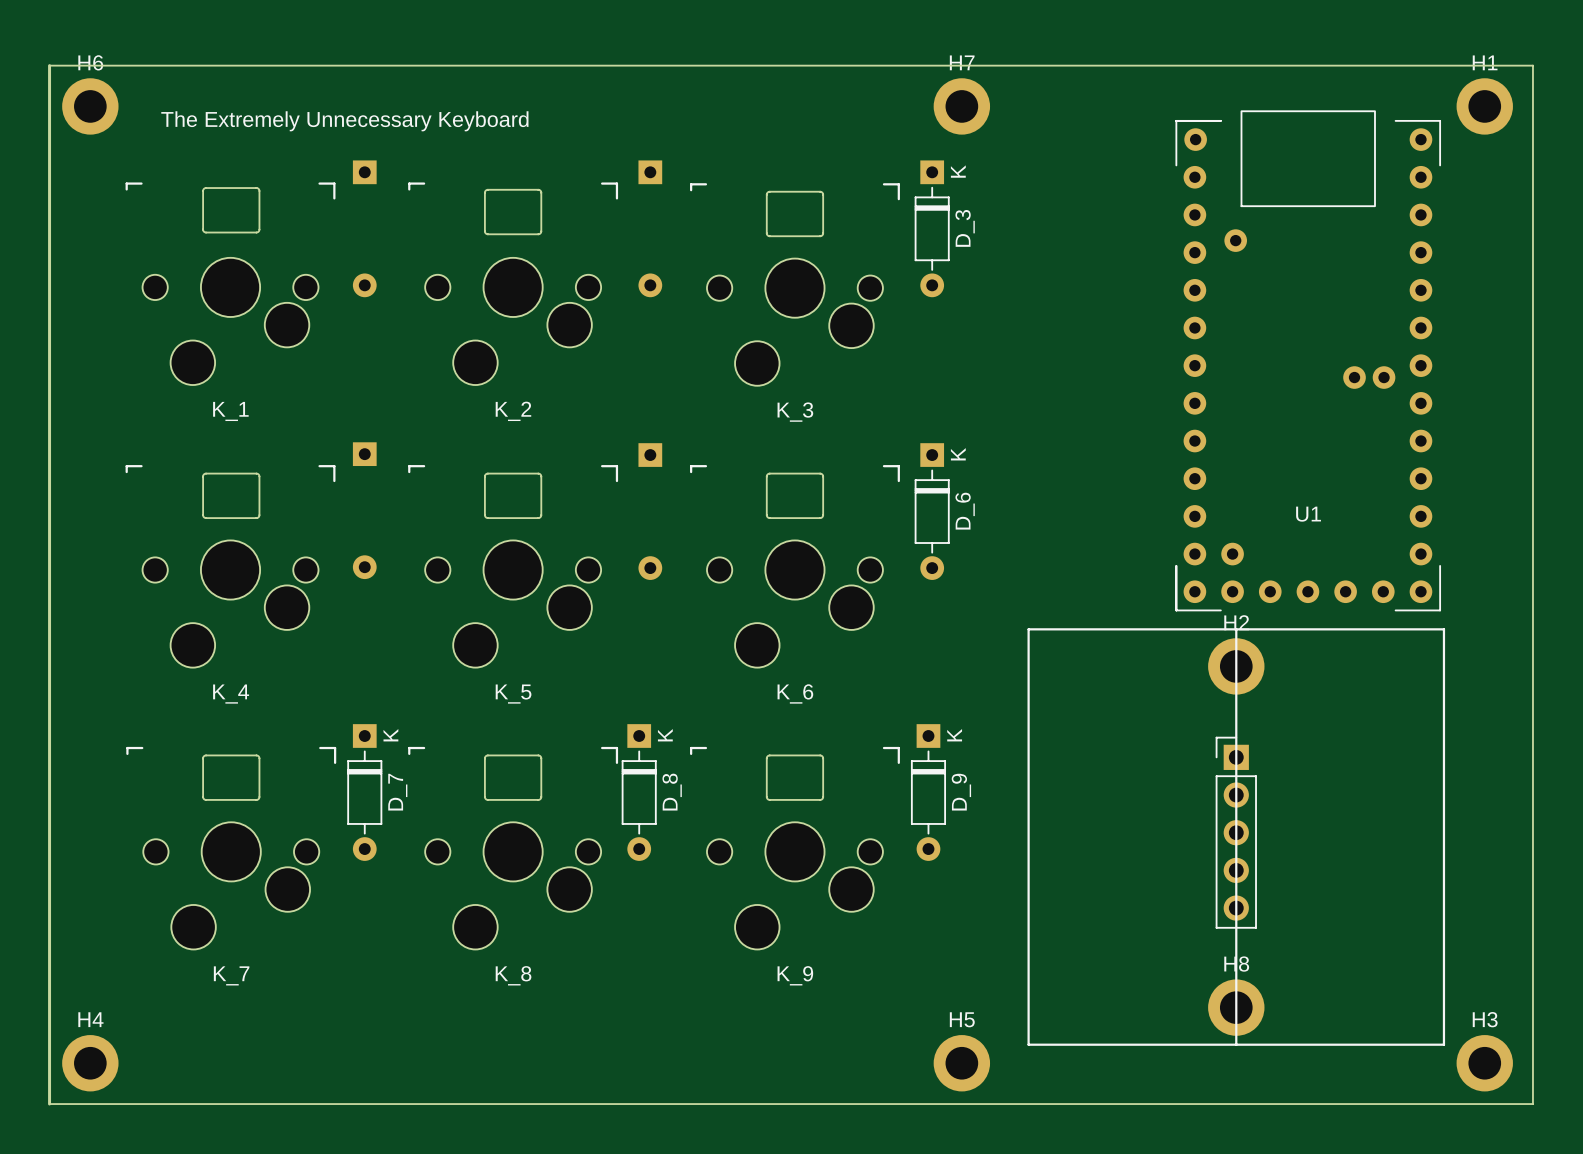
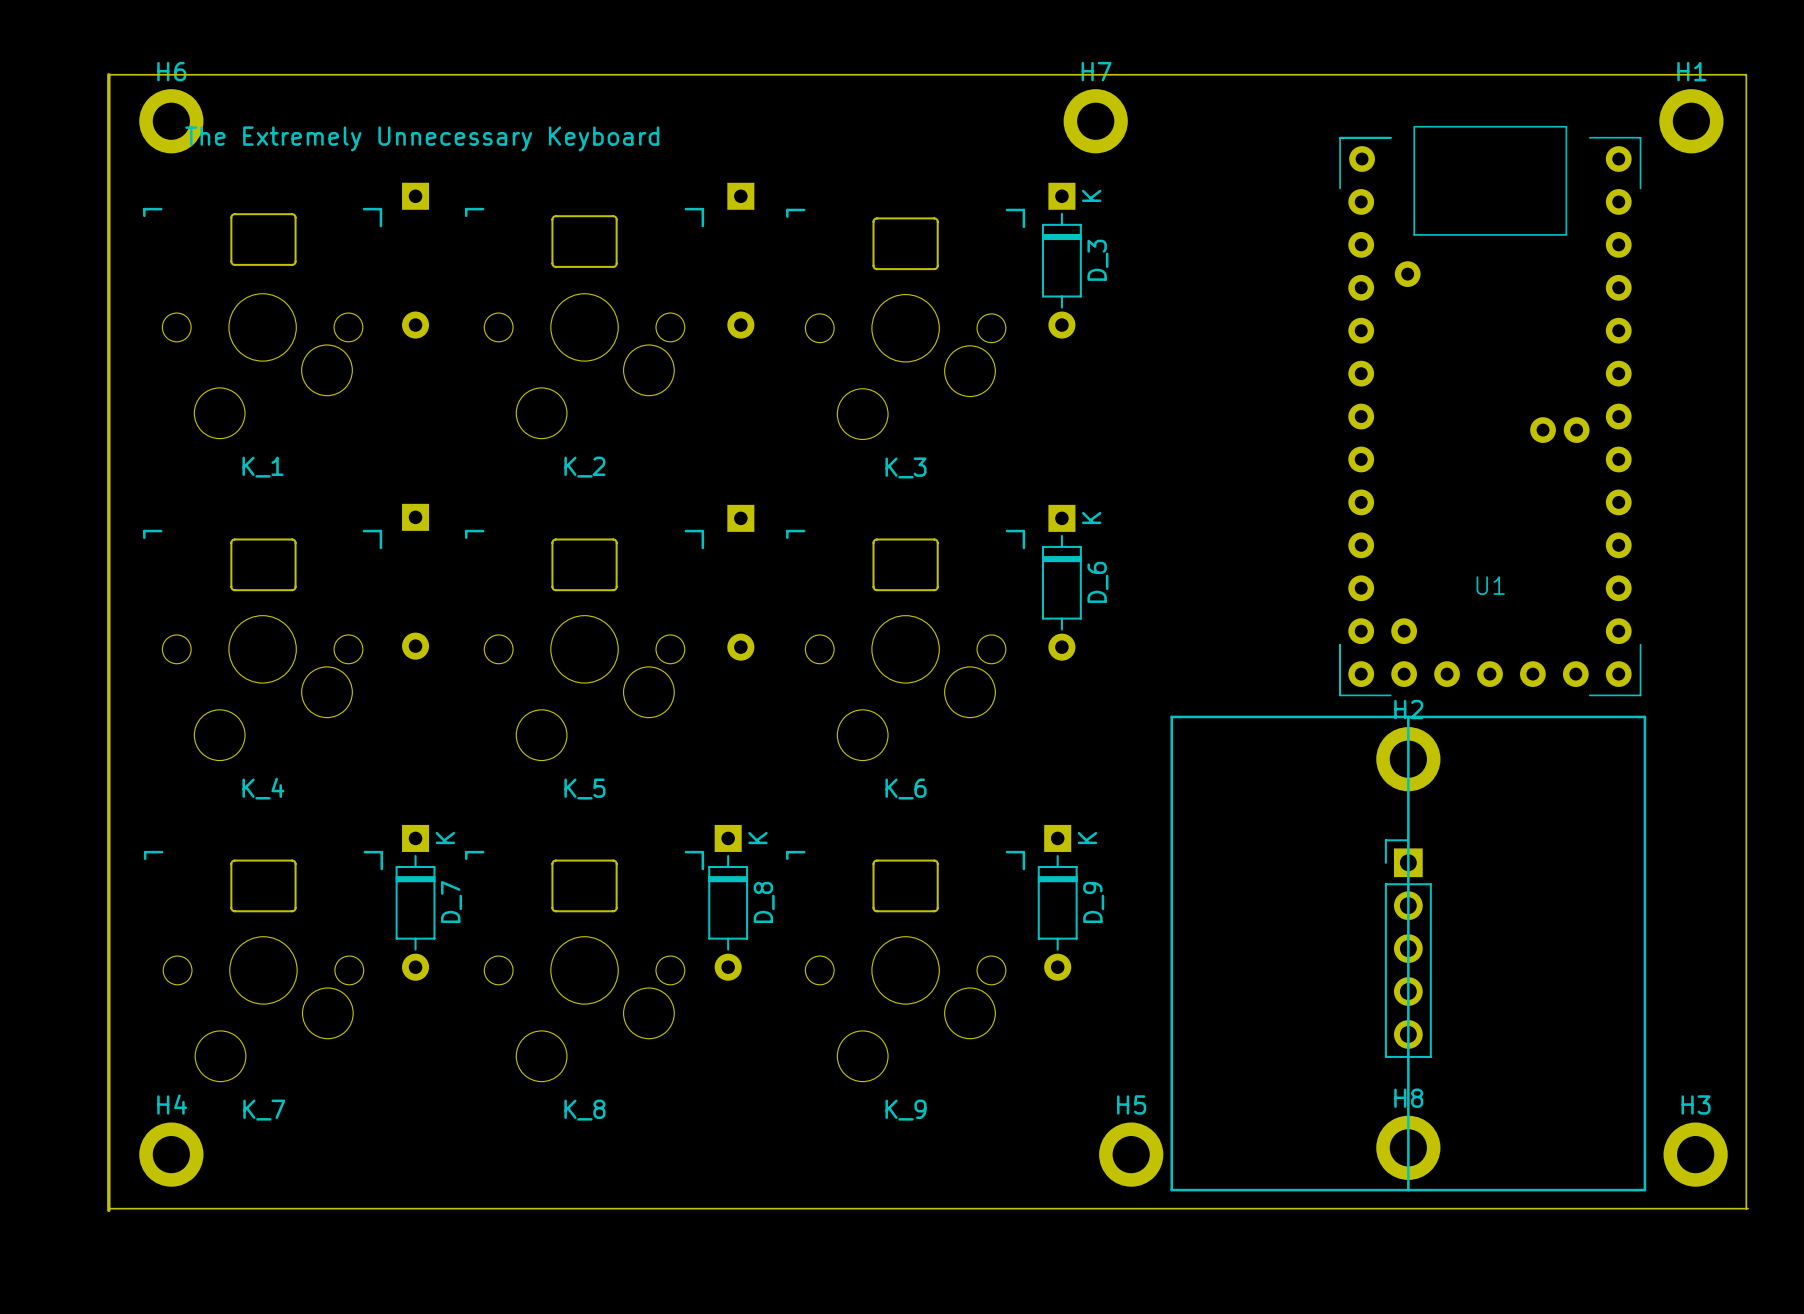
board edge: (95, 65) (49, 65) (49, 1104) (1532, 1104) (1532, 1061) -> (108, 74) (108, 1210)
H6 position: (90, 106) -> (171, 121)
board edge: none -> (108, 1208) (1748, 1208)
H4 position: (90, 1063) -> (171, 1154)
H5 position: (961, 1063) -> (1131, 1154)
H3 position: (1484, 1063) -> (1695, 1154)

